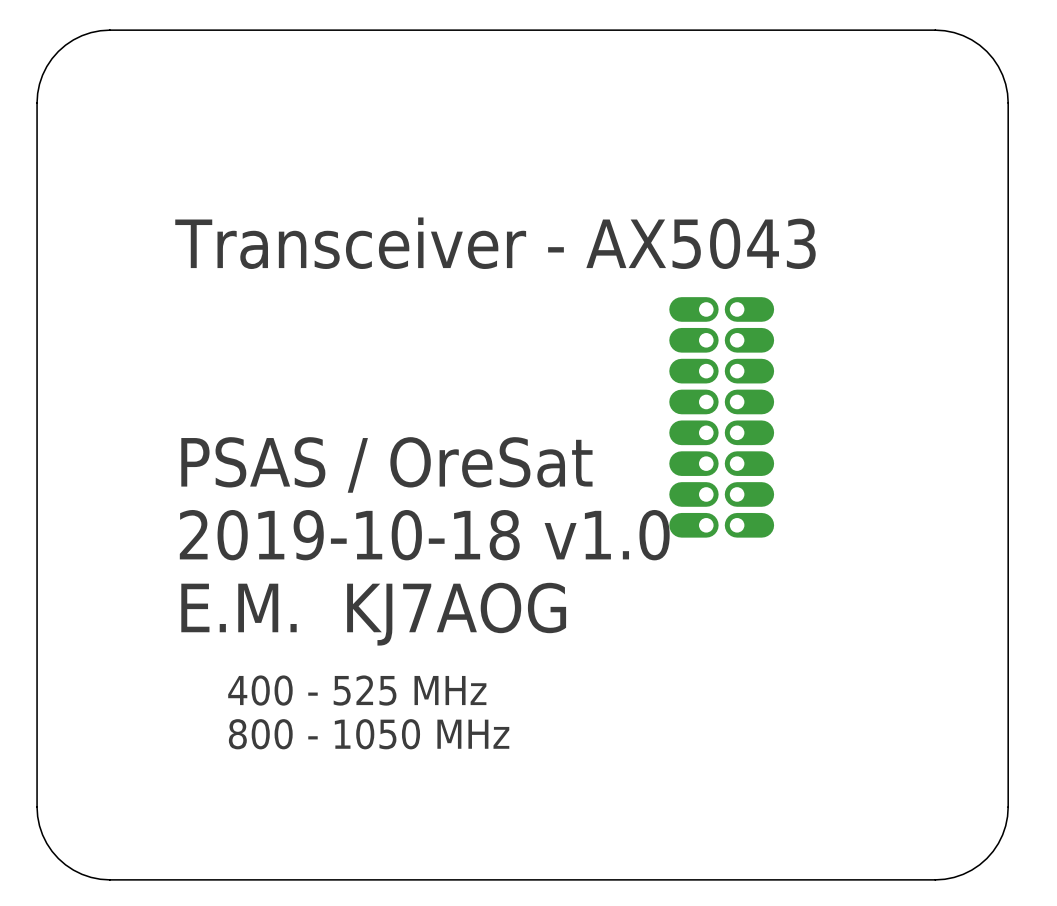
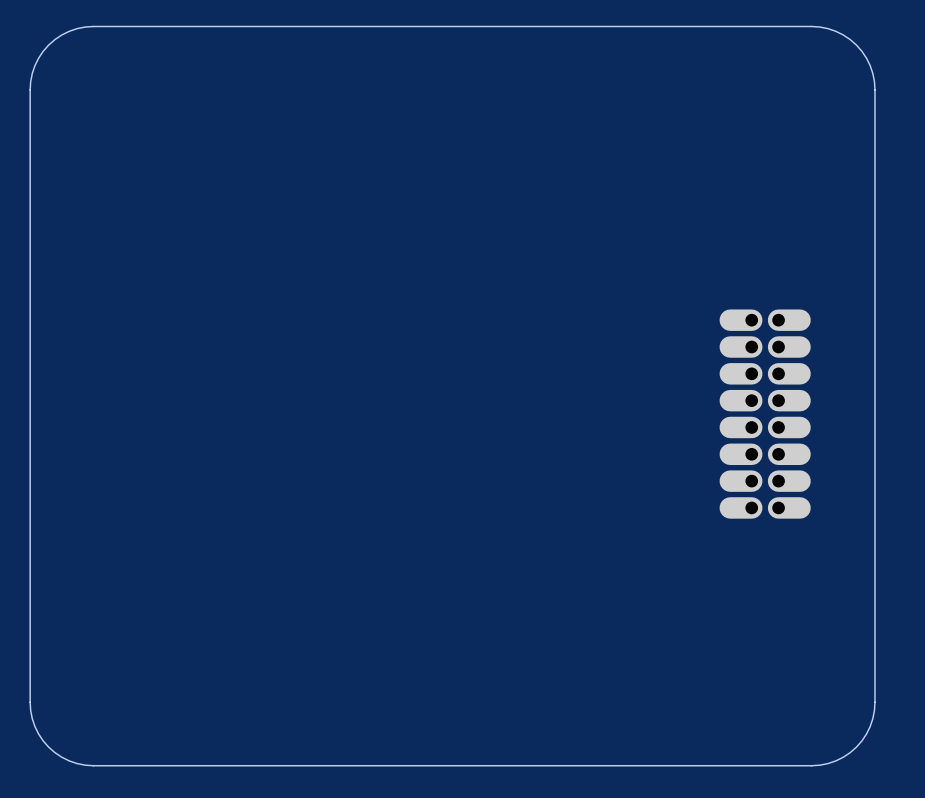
text: Transceiver - AX5043 (495, 243) -> none
part position: (721, 417) -> (765, 414)
text: PSAS / OreSat (386, 464) -> none
text: 2019-10-18 v1.0 (424, 535) -> none
text: E.M. KJ7AOG (373, 614) -> none
text: 400 - 525 MHz (357, 690) -> none
text: 800 - 1050 MHz (369, 734) -> none

